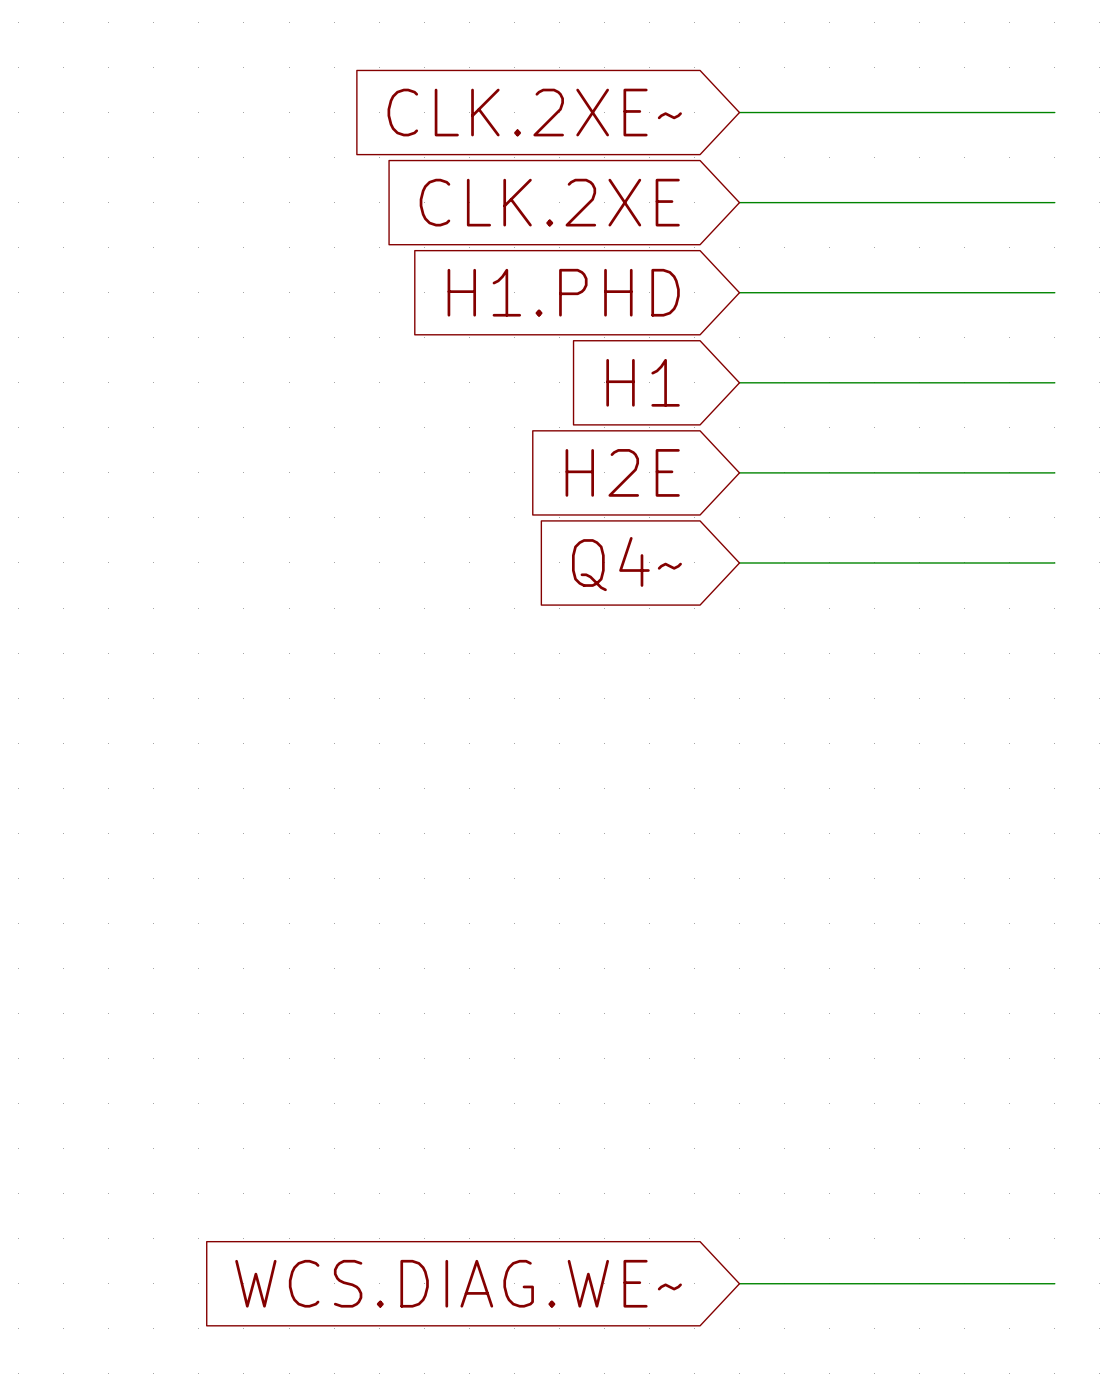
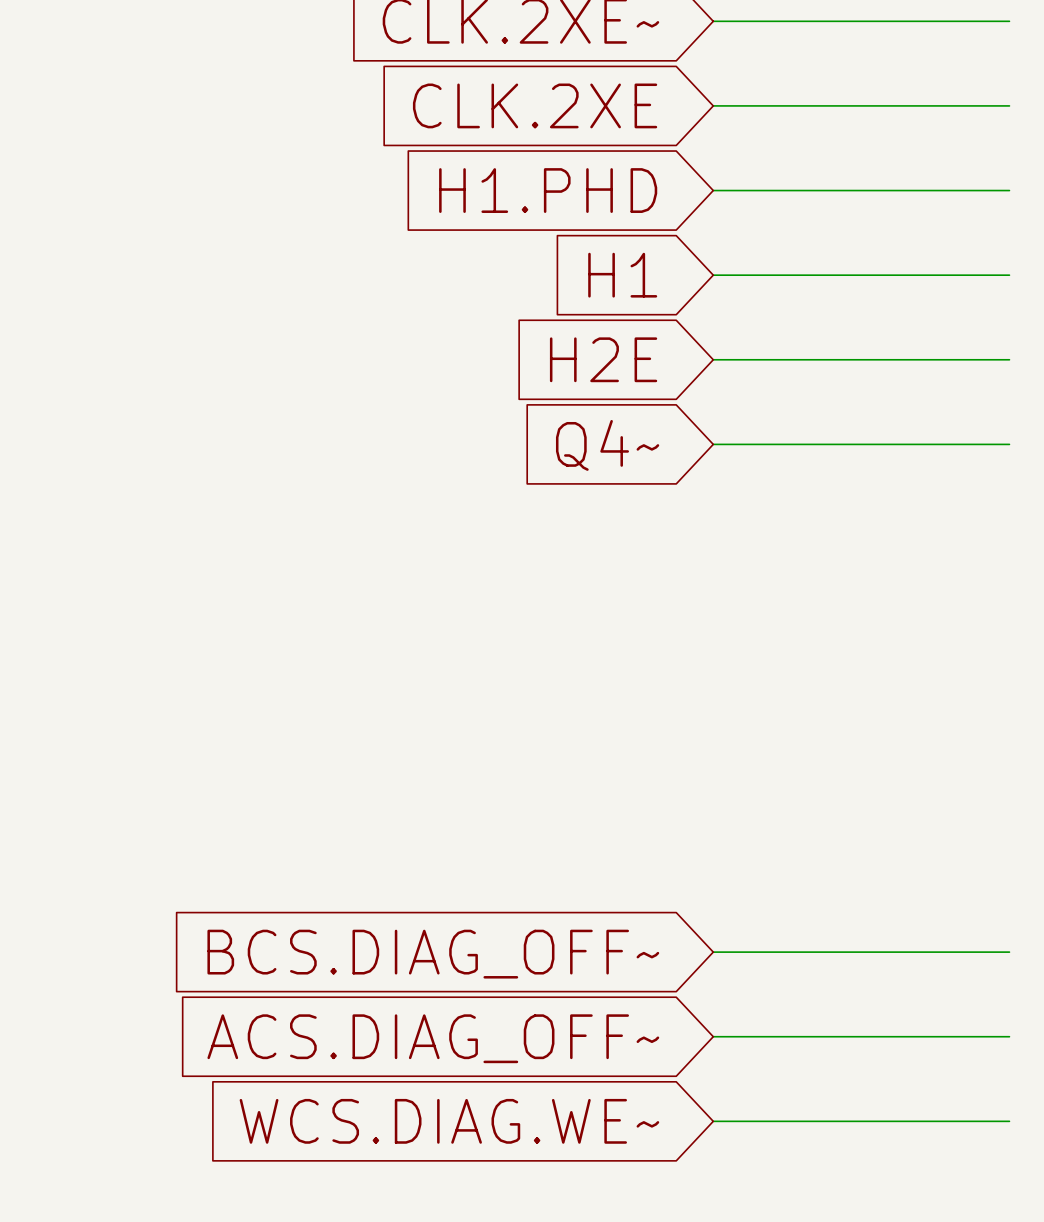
wire: none -> (713, 952) (1009, 952)
global label: none -> BCS.DIAG_OFF~ (433, 954)
wire: none -> (713, 1036) (1009, 1036)
global label: none -> ACS.DIAG_OFF~ (433, 1038)

